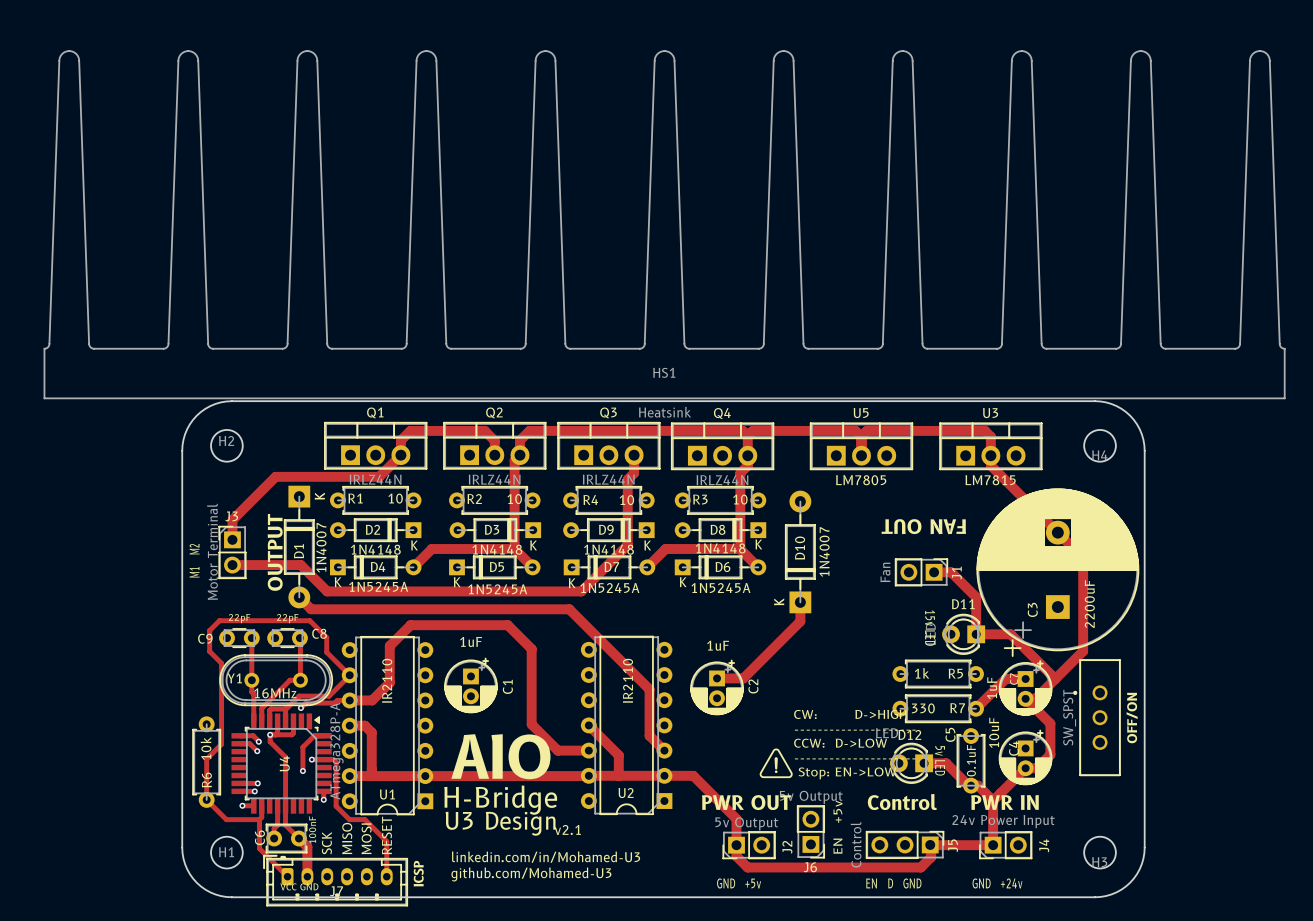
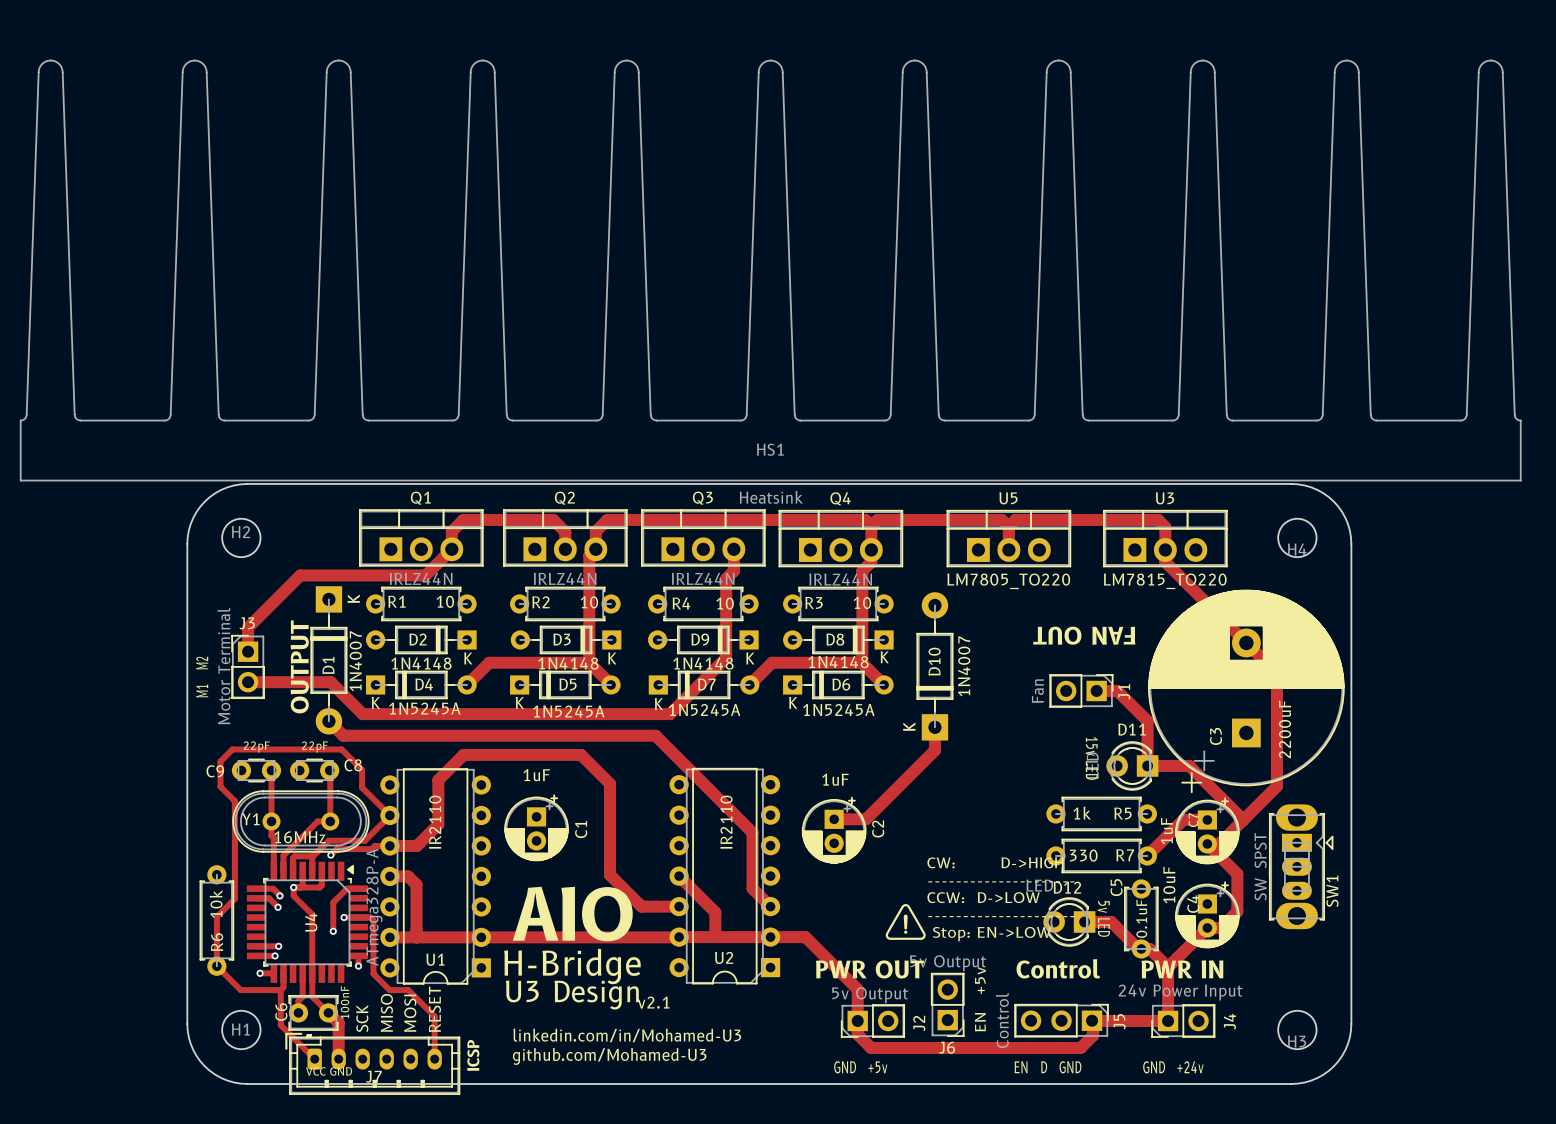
U5 value: LM7805 (861, 480) -> LM7805_TO220 (1008, 581)
U3 value: LM7815 (990, 480) -> LM7815_TO220 (1165, 581)
OFF/ON: SW_SPST (1096, 717) -> none
SW1: none -> SW_SPST (1301, 866)

